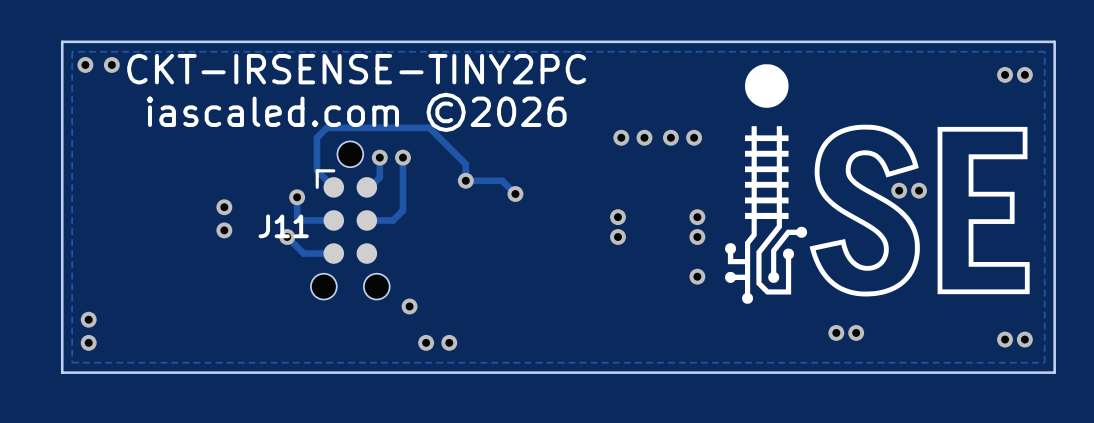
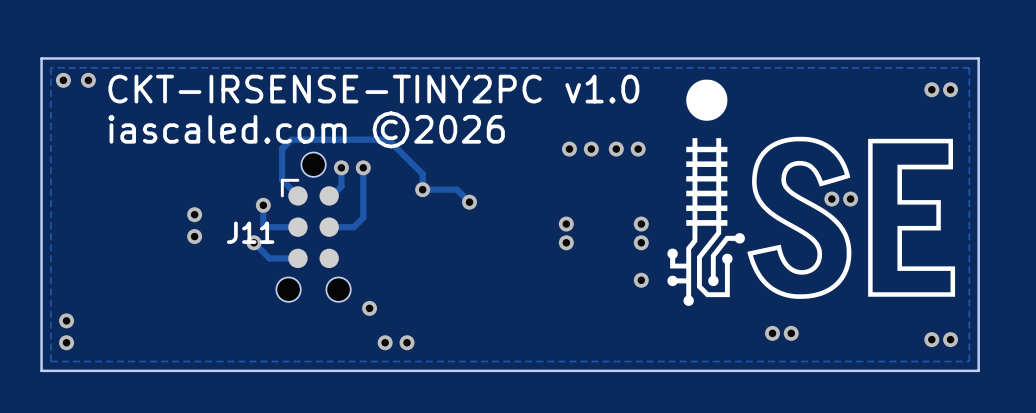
text: CKT-IRSENSE-TINY2PC (356, 69) -> CKT-IRSENSE-TINY2PC v1.0 (373, 89)
text position: iascaled.com ©2026 (356, 112) -> iascaled.com ©2026 (306, 129)

